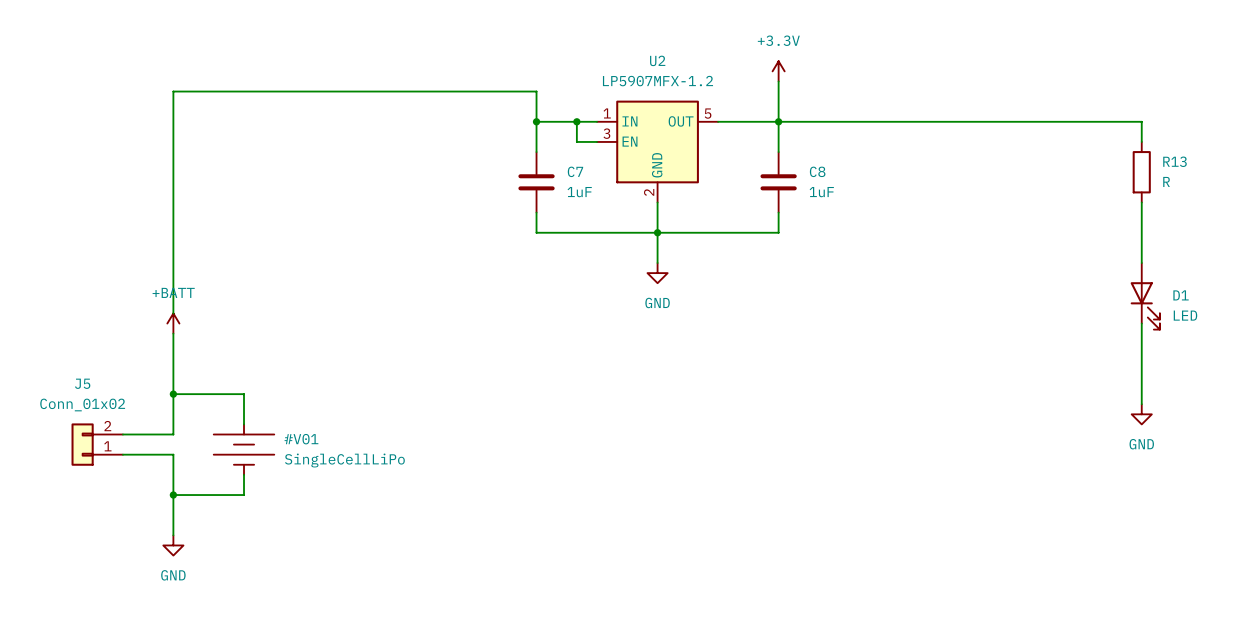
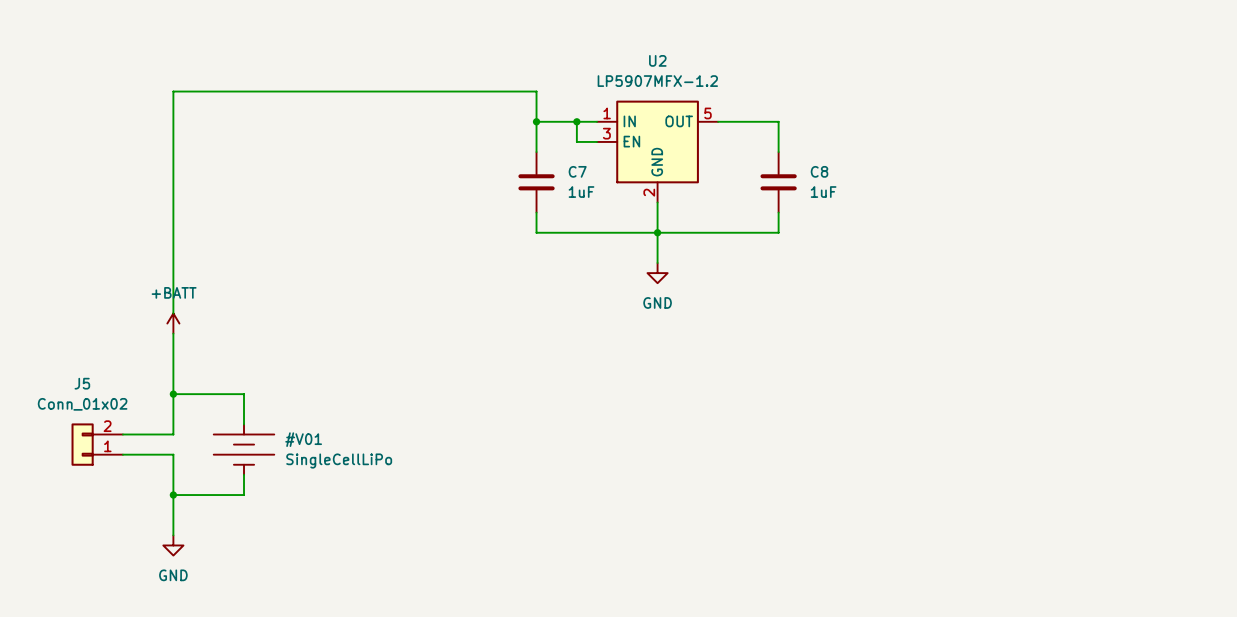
power symbol: +3.3V (778, 71) -> none
wire: (778, 81) (778, 121) (1141, 121) (1141, 141) -> none
junction: (778, 121) -> none
R13: R (1141, 172) -> none
wire: (1141, 202) (1141, 263) -> none
D1: LED (1145, 296) -> none
wire: (1141, 323) (1141, 404) -> none
power symbol: GND (1141, 414) -> none

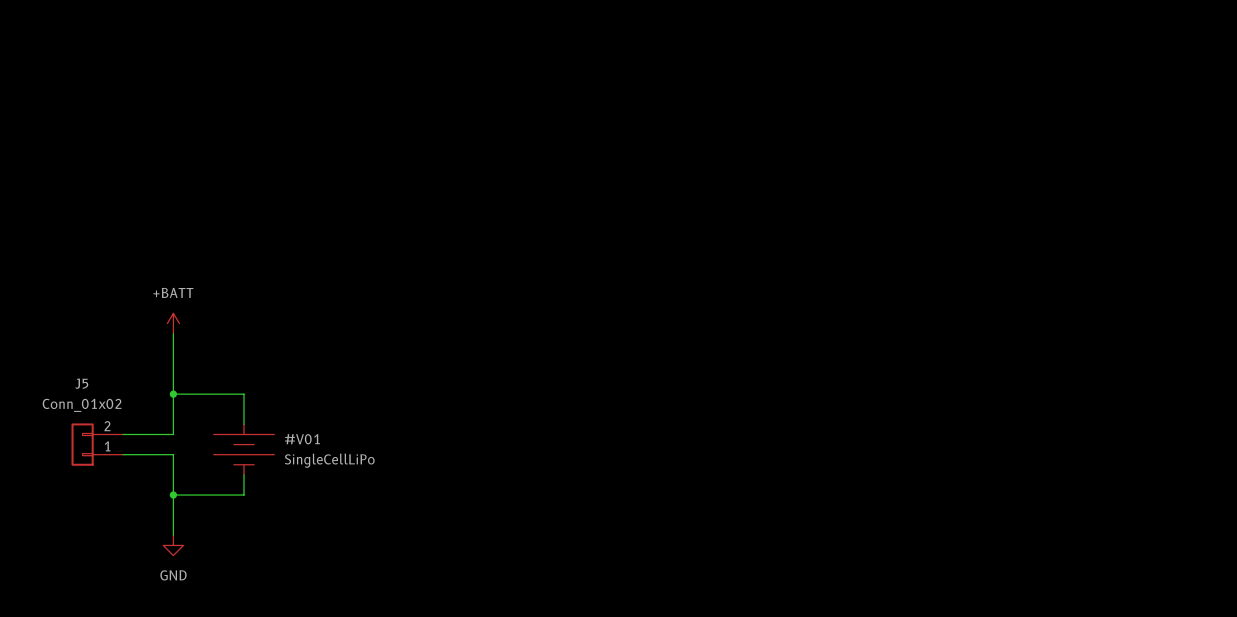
wire: (536, 121) (597, 121) -> none
junction: (536, 121) -> none
wire: (576, 121) (576, 141) (597, 141) -> none
junction: (576, 121) -> none
wire: (718, 121) (778, 121) (778, 152) -> none
U2: LP5907MFX-1.2 (657, 151) -> none
wire: (536, 152) (536, 91) (173, 91) (173, 313) -> none
C7: 1uF (536, 182) -> none
C8: 1uF (778, 182) -> none
wire: (657, 202) (657, 263) -> none
wire: (536, 212) (536, 232) (778, 232) (778, 212) -> none
junction: (657, 232) -> none
power symbol: GND (657, 273) -> none

